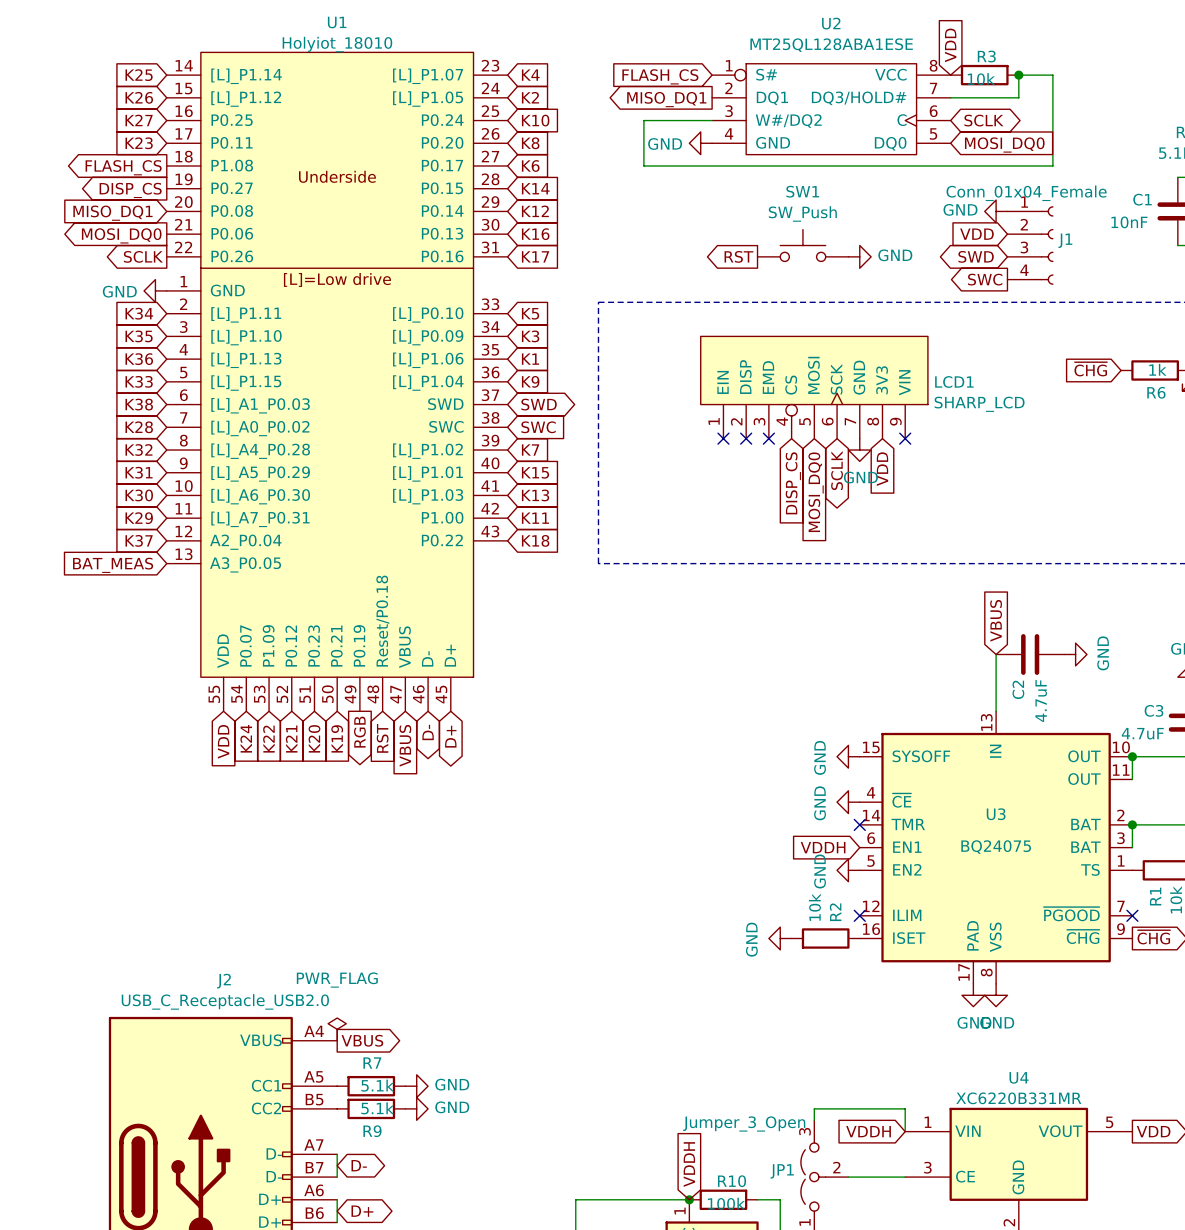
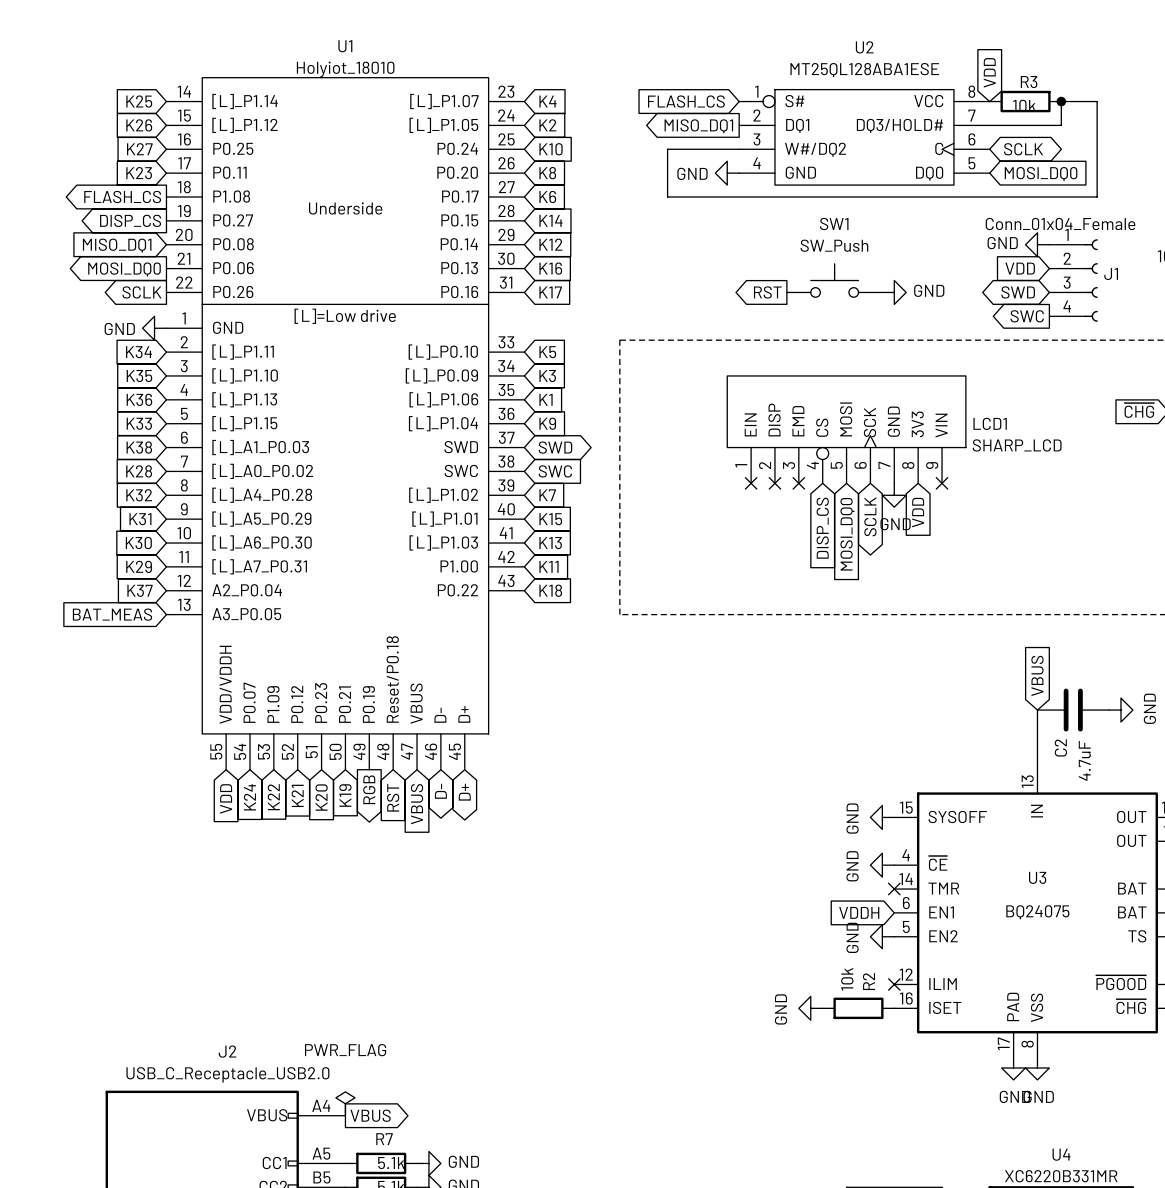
U1 pin name: VDD (223, 651) -> VDD/VDDH (225, 684)

